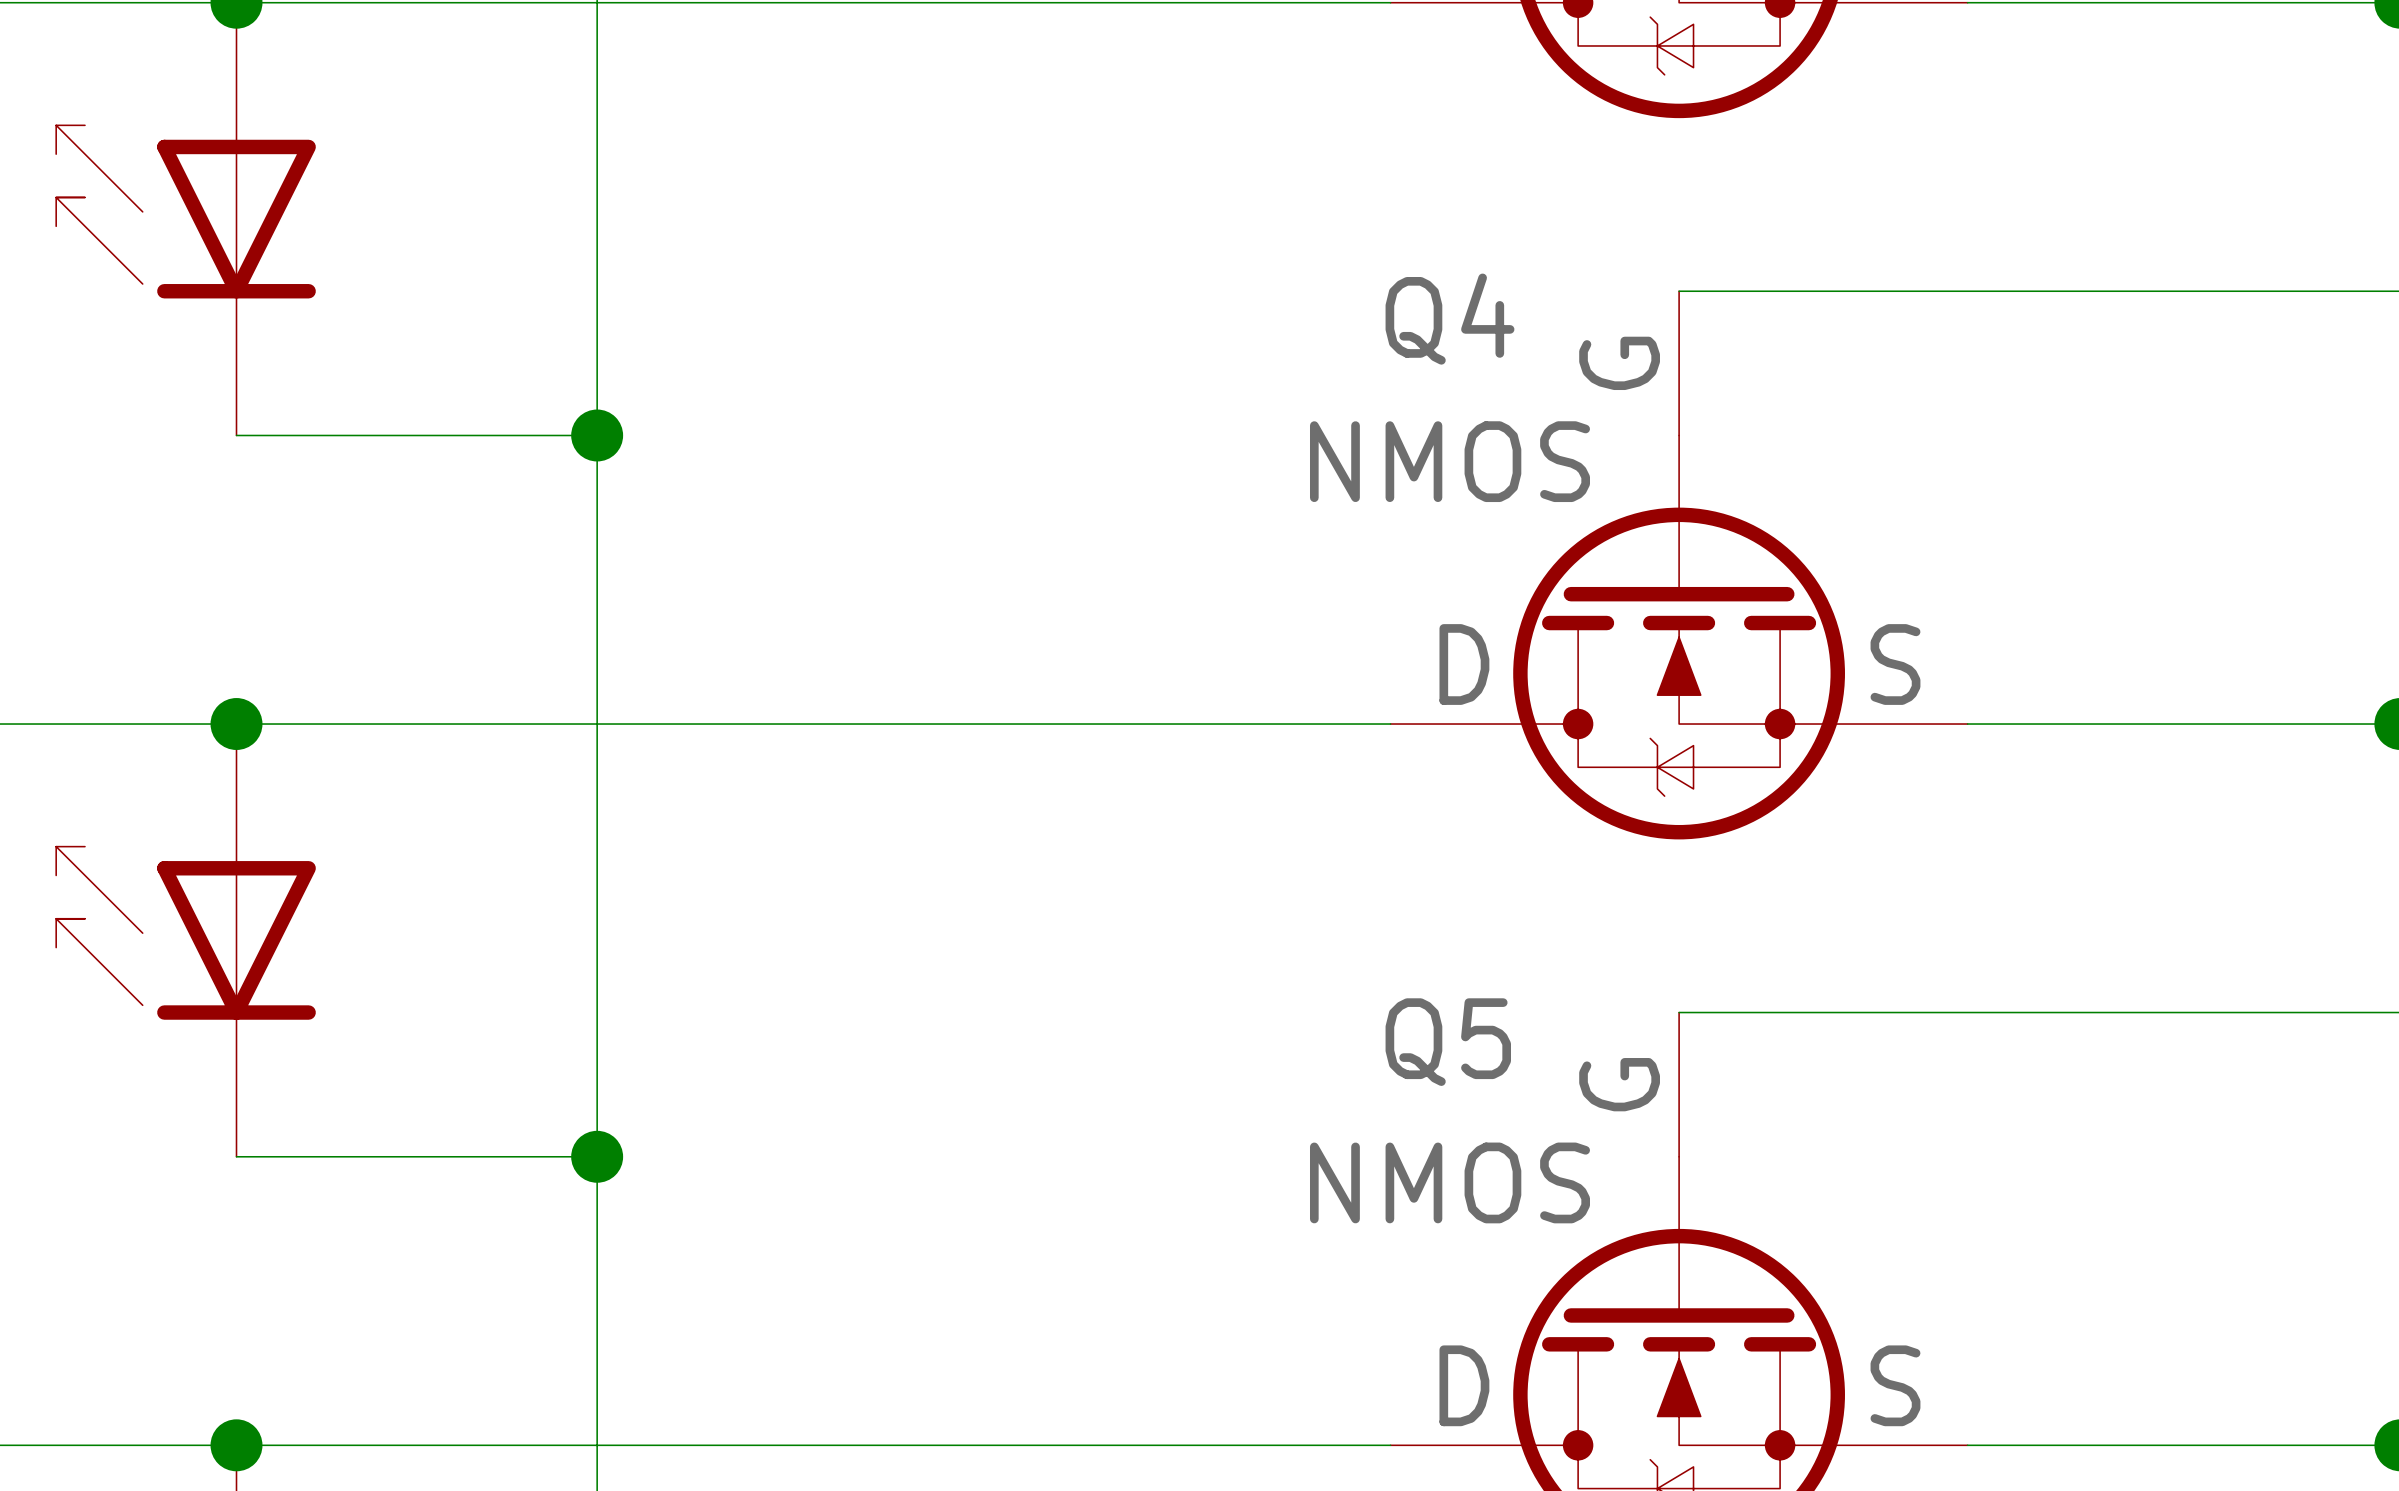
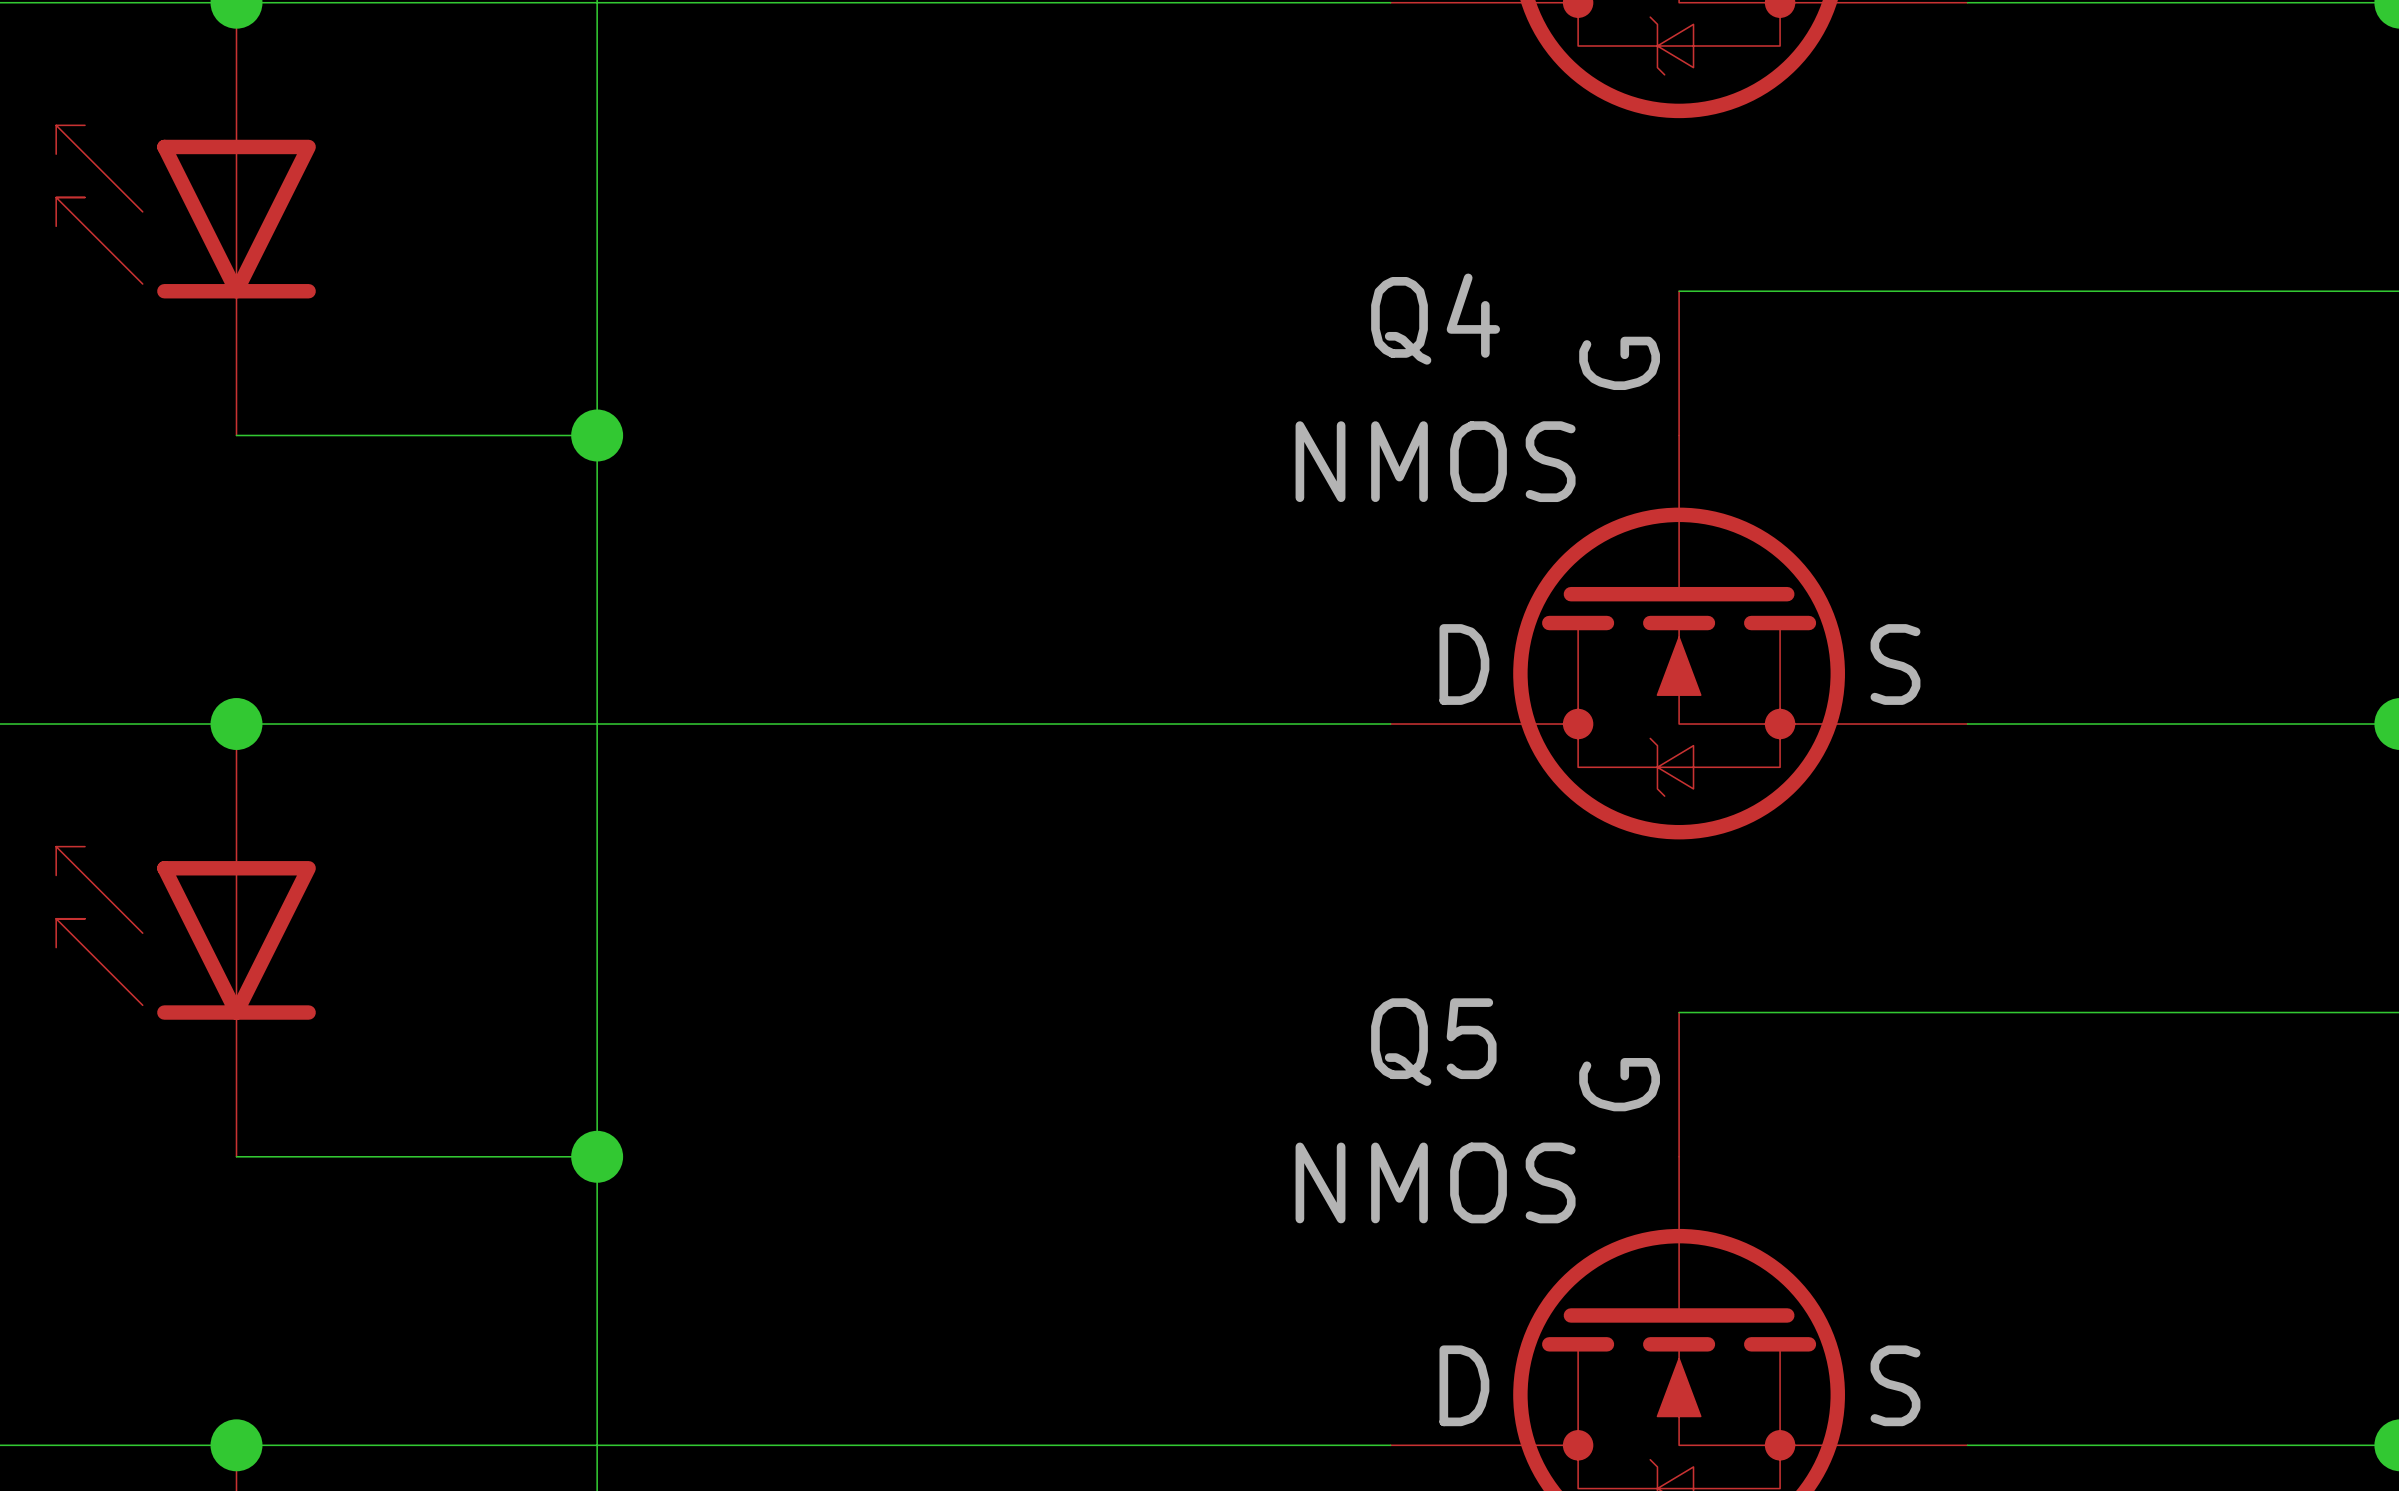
Q4 name position: Q4 (1449, 319) -> Q4 (1435, 319)
Q4 value position: NMOS (1449, 461) -> NMOS (1435, 461)
Q5 name position: Q5 (1448, 1042) -> Q5 (1433, 1042)
Q5 value position: NMOS (1449, 1182) -> NMOS (1435, 1182)

